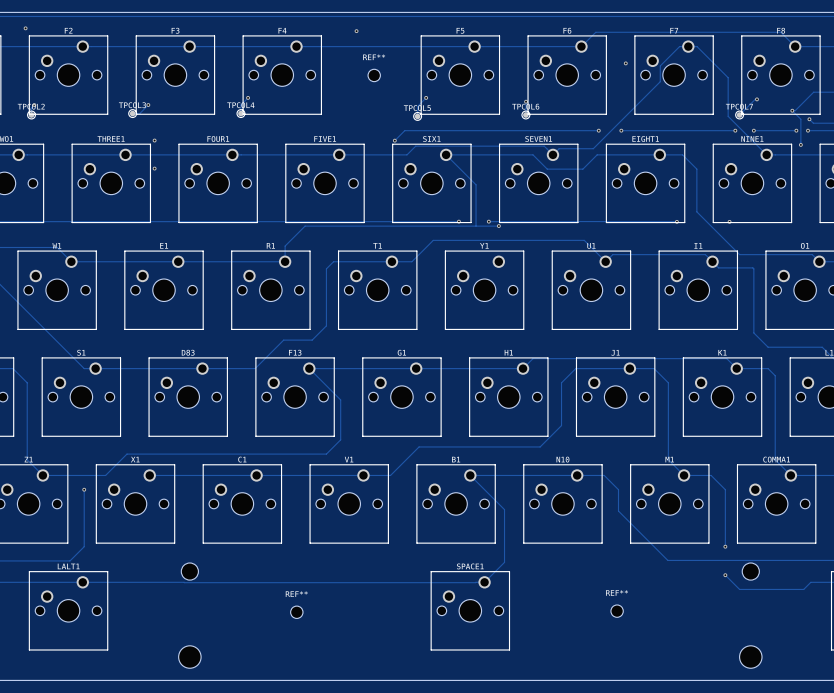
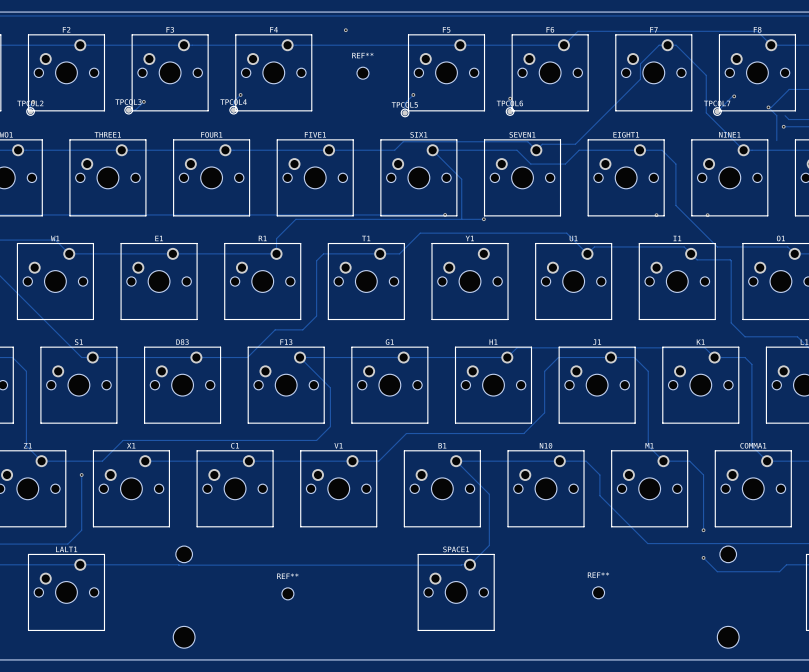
via: (25, 28) -> none
via: (625, 63) -> none
via: (809, 119) -> none
track: (598, 130) (404, 130) (394, 140) -> none
via: (598, 130) -> none
track: (621, 130) (735, 130) -> none
via: (621, 130) -> none
via: (735, 130) -> none
track: (753, 130) (796, 130) -> none
via: (753, 130) -> none
via: (796, 130) -> none
via: (154, 140) -> none
via: (394, 140) -> none
via: (800, 144) -> none
via: (154, 168) -> none
track: (488, 221) (676, 221) -> none
via: (488, 221) -> none

